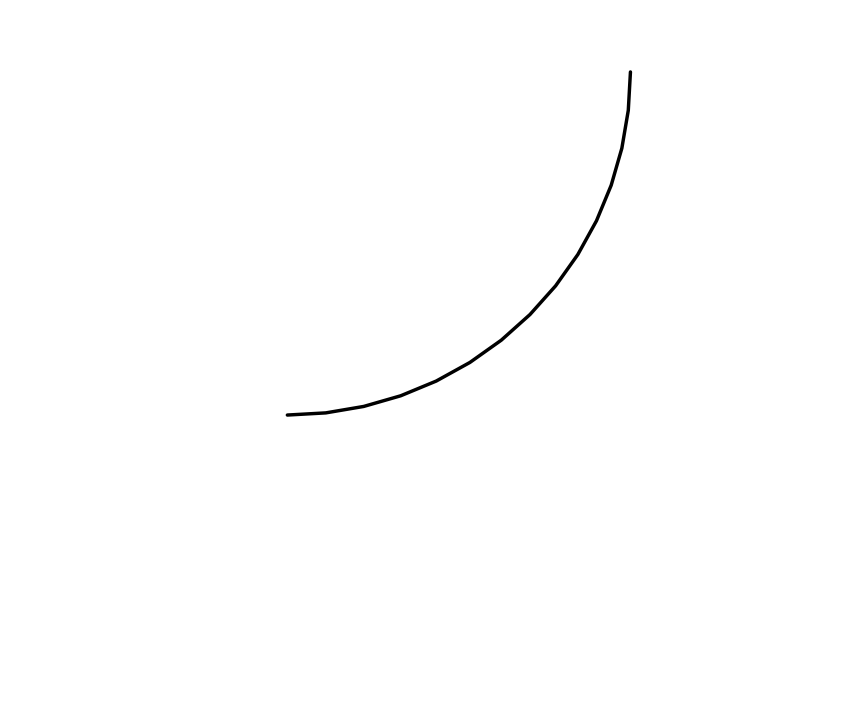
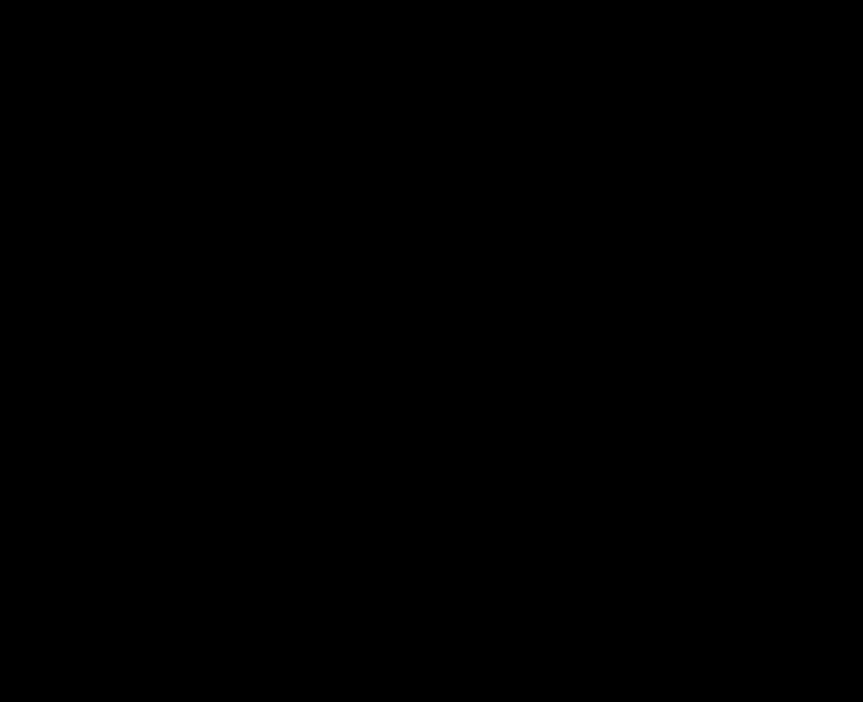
board edge: (630, 71) (628, 110) (621, 148) (611, 185) (596, 220) (577, 254) (555, 285) (529, 314) (501, 340) (469, 362) (436, 381) (400, 395) (363, 406) (325, 412) (287, 415) -> none

